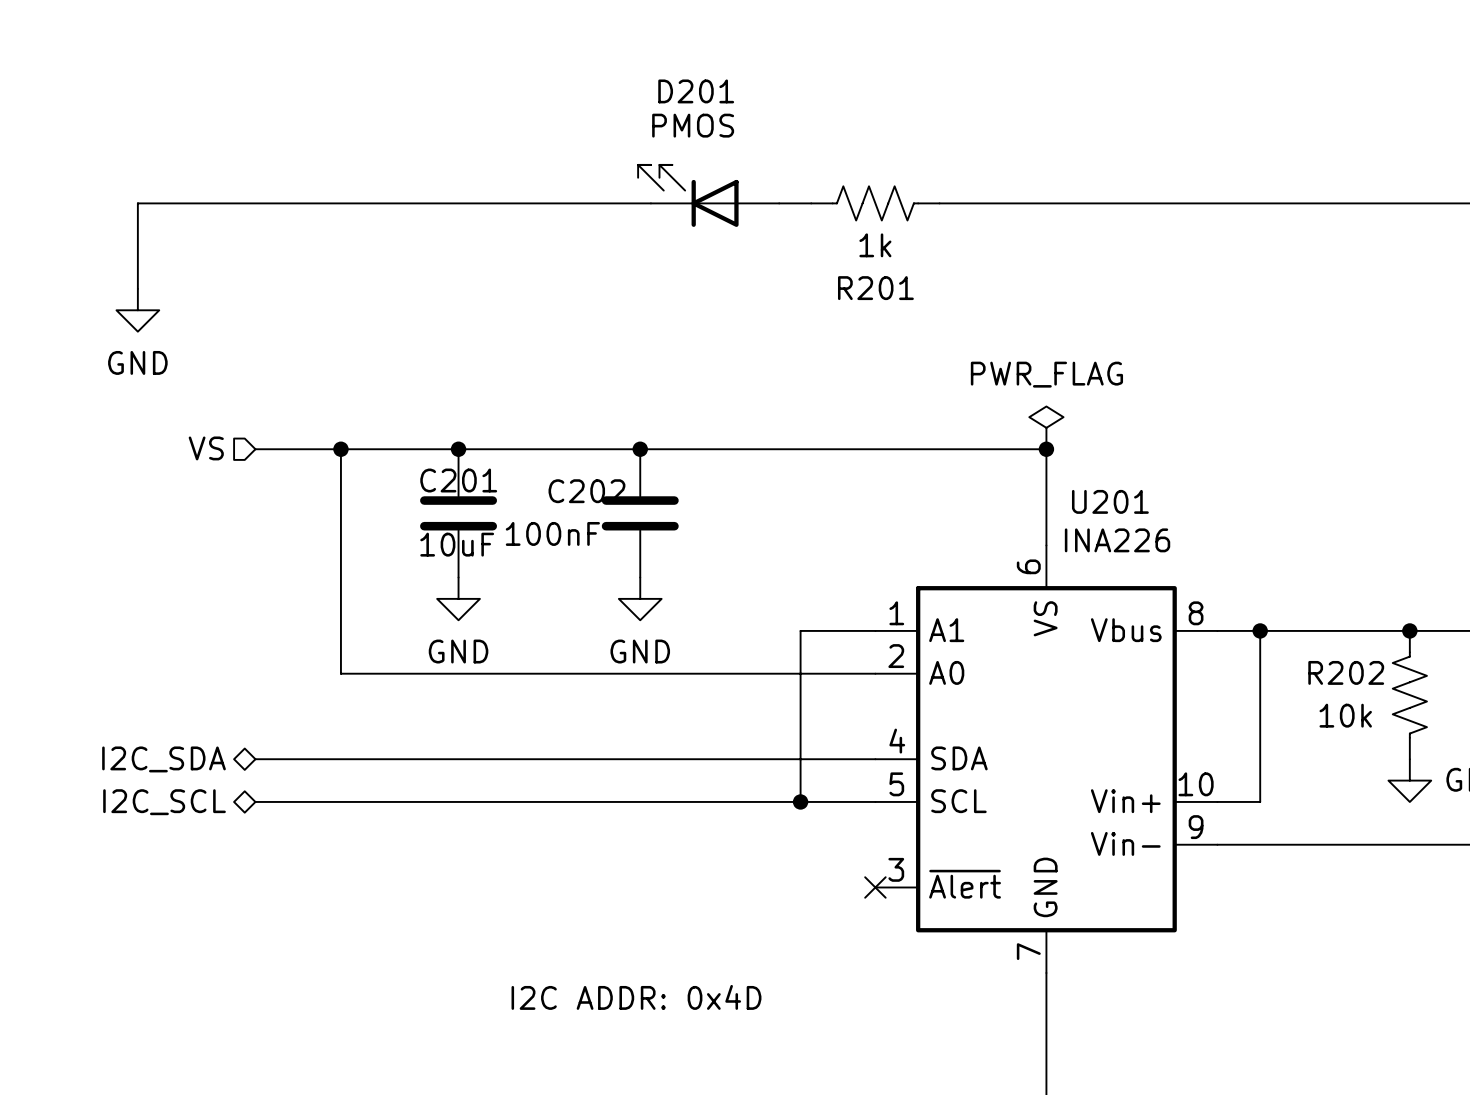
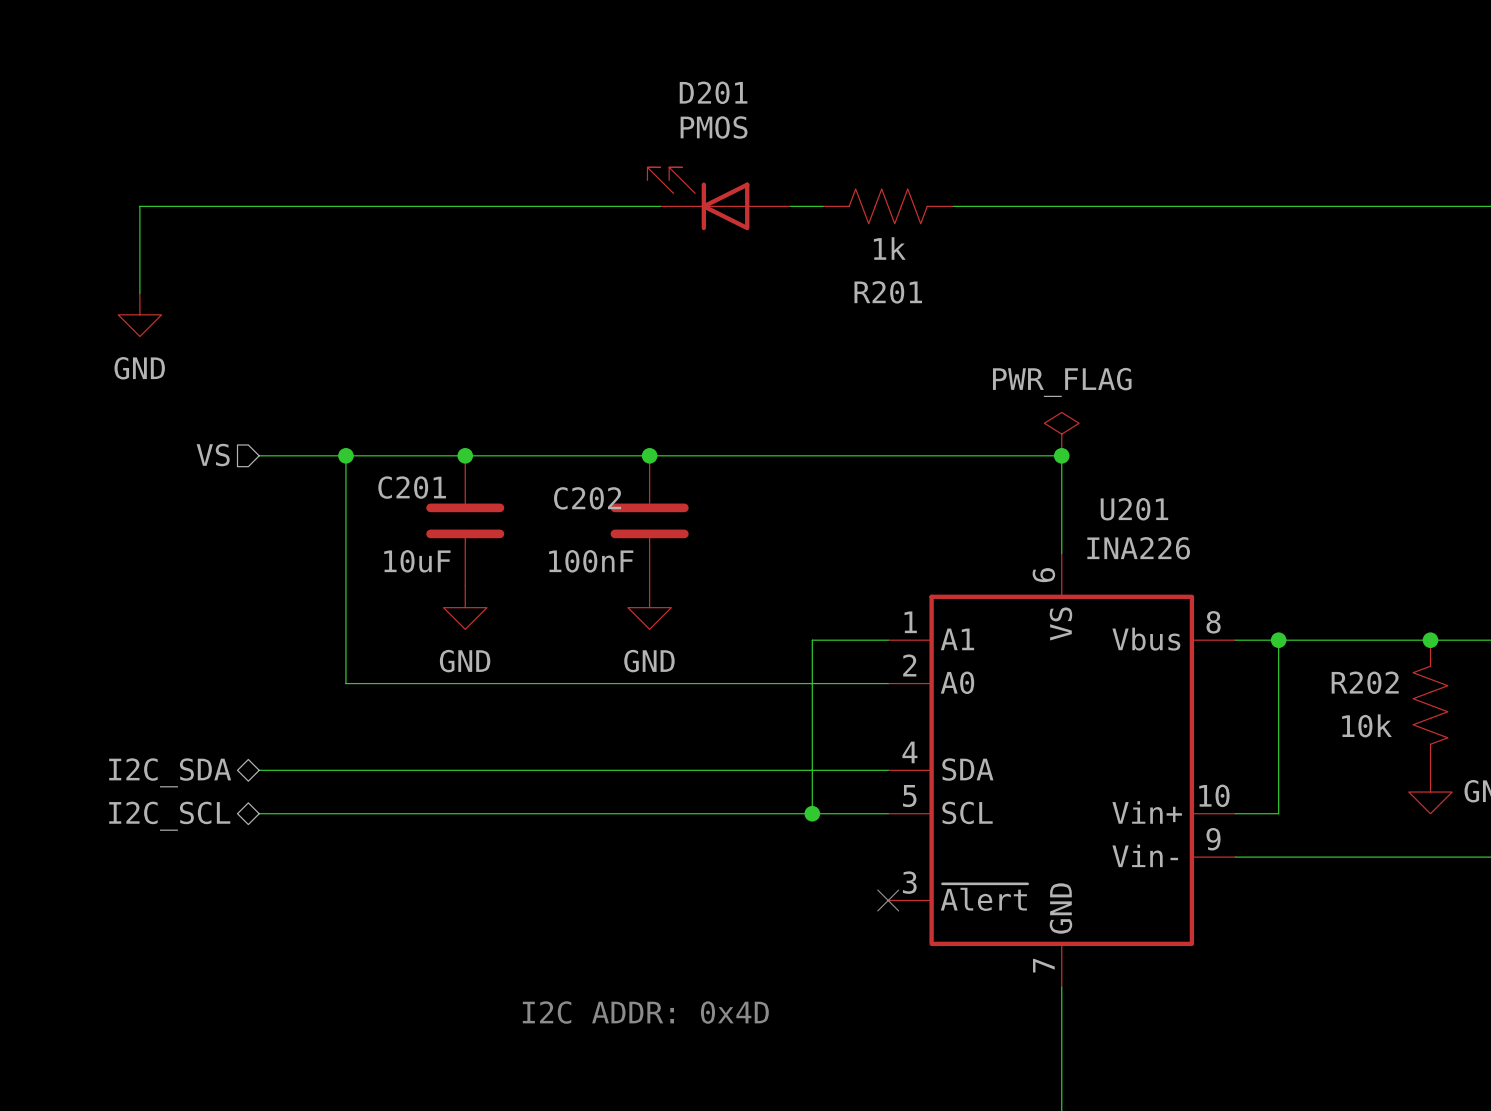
C201 name position: C201 (458, 480) -> C201 (412, 487)
C202 value position: 100nF (552, 533) -> 100nF (591, 561)
C201 value position: 10uF (457, 544) -> 10uF (417, 561)

